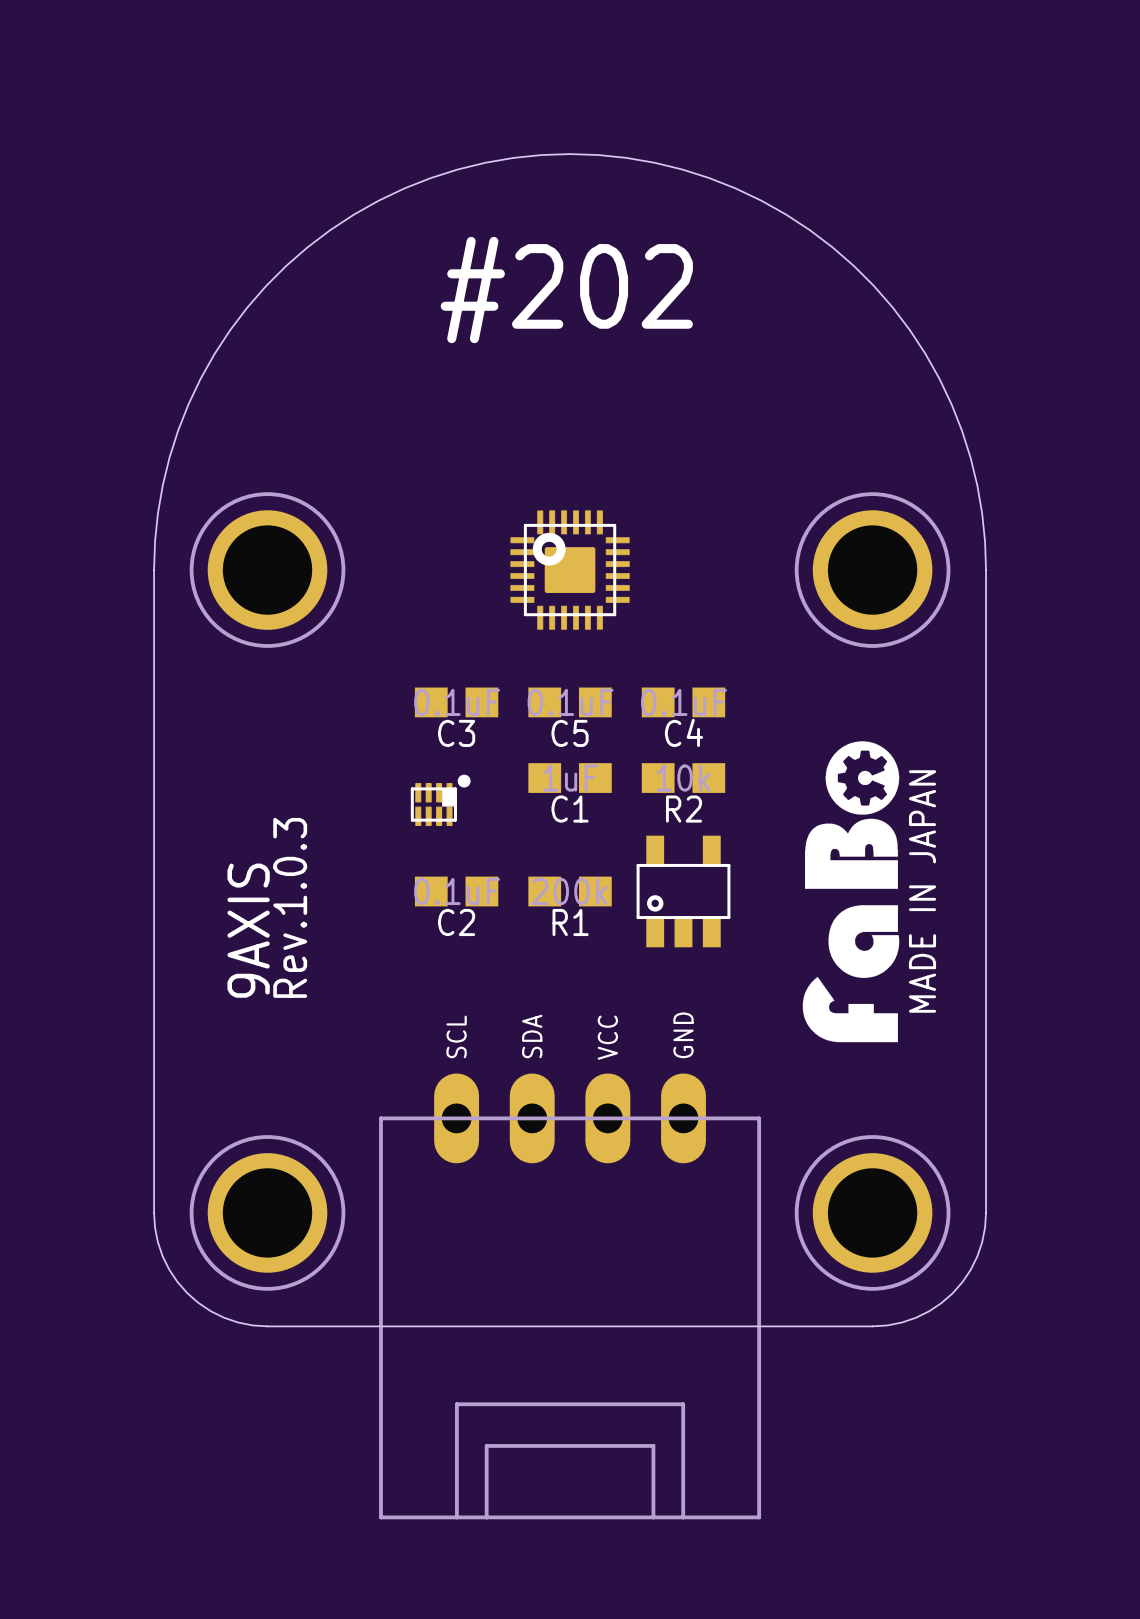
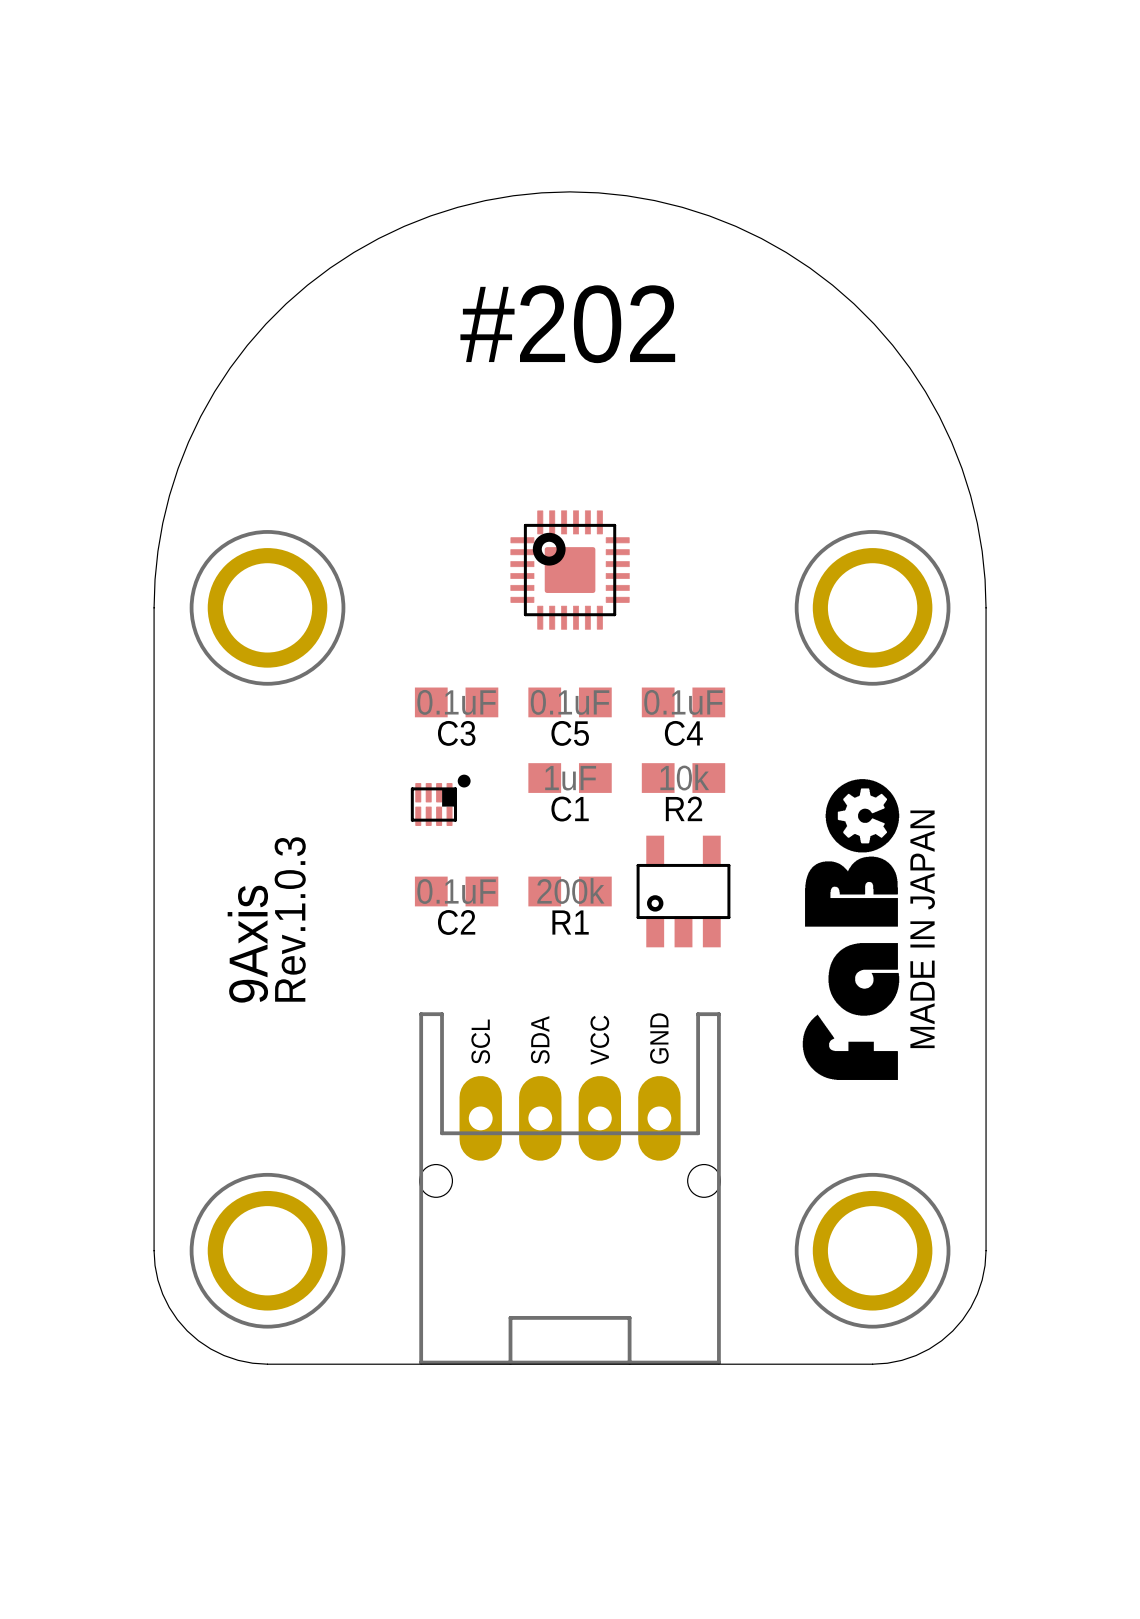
text position: #202 (566, 290) -> #202 (567, 324)
part: none -> (570, 778)
part: (570, 836) -> none
drawing position: (851, 891) -> (851, 929)
text position: MADE IN JAPAN (922, 891) -> MADE IN JAPAN (922, 929)
text: 9AXIS (248, 930) -> 9Axis (247, 944)

